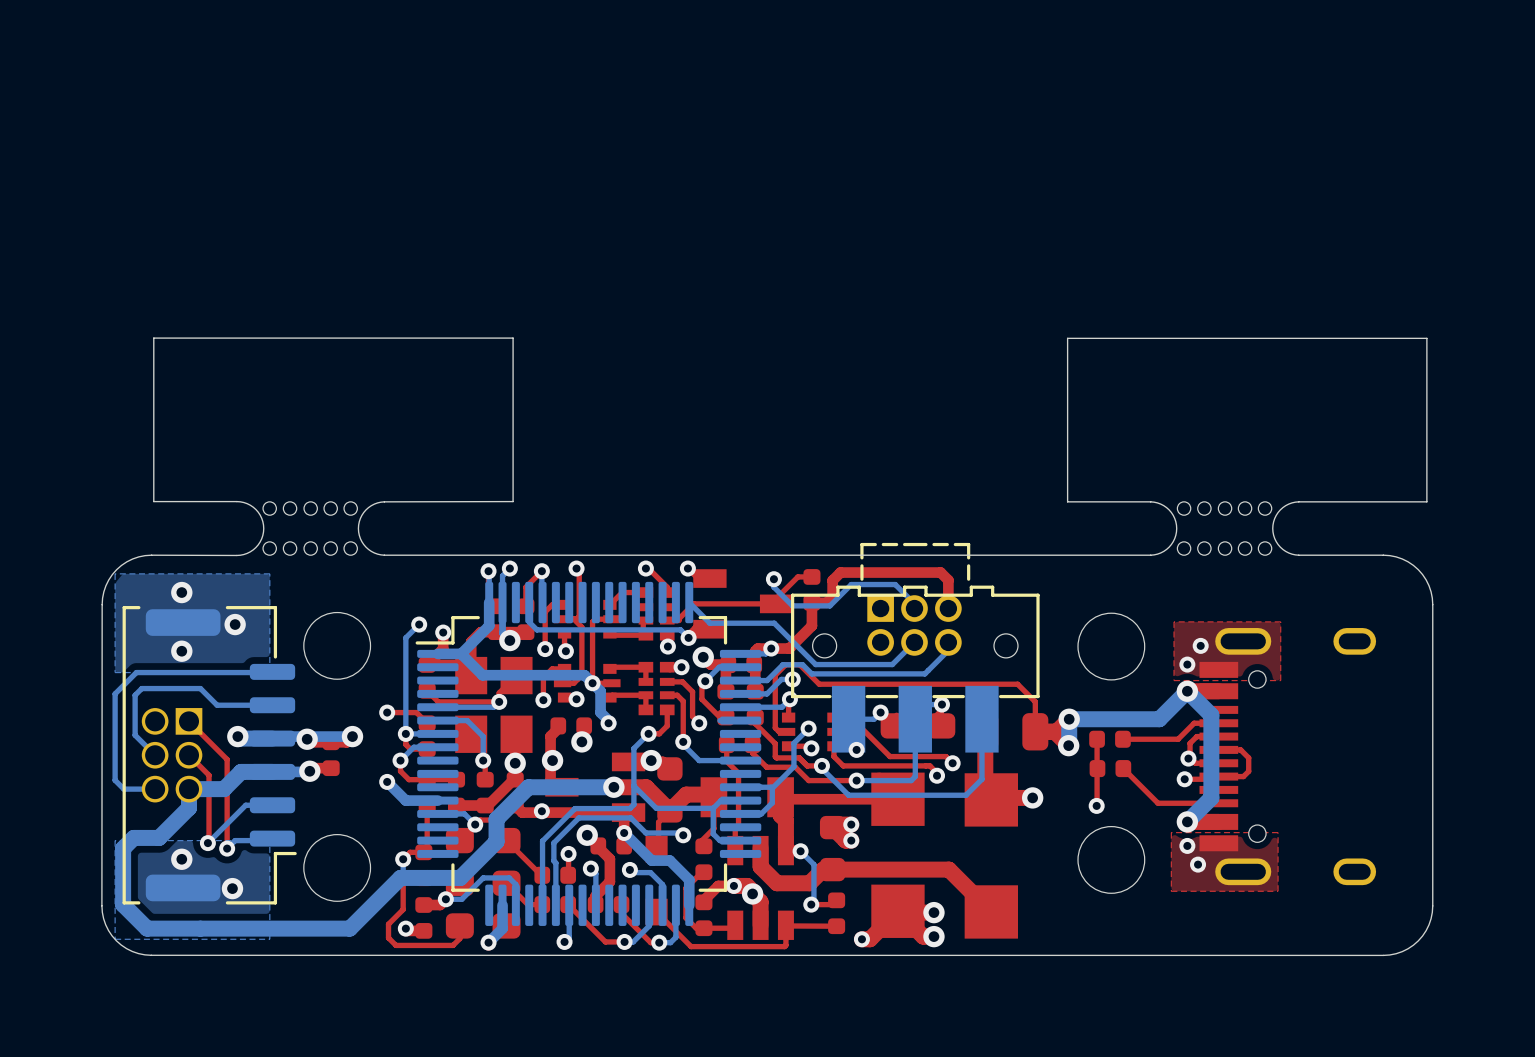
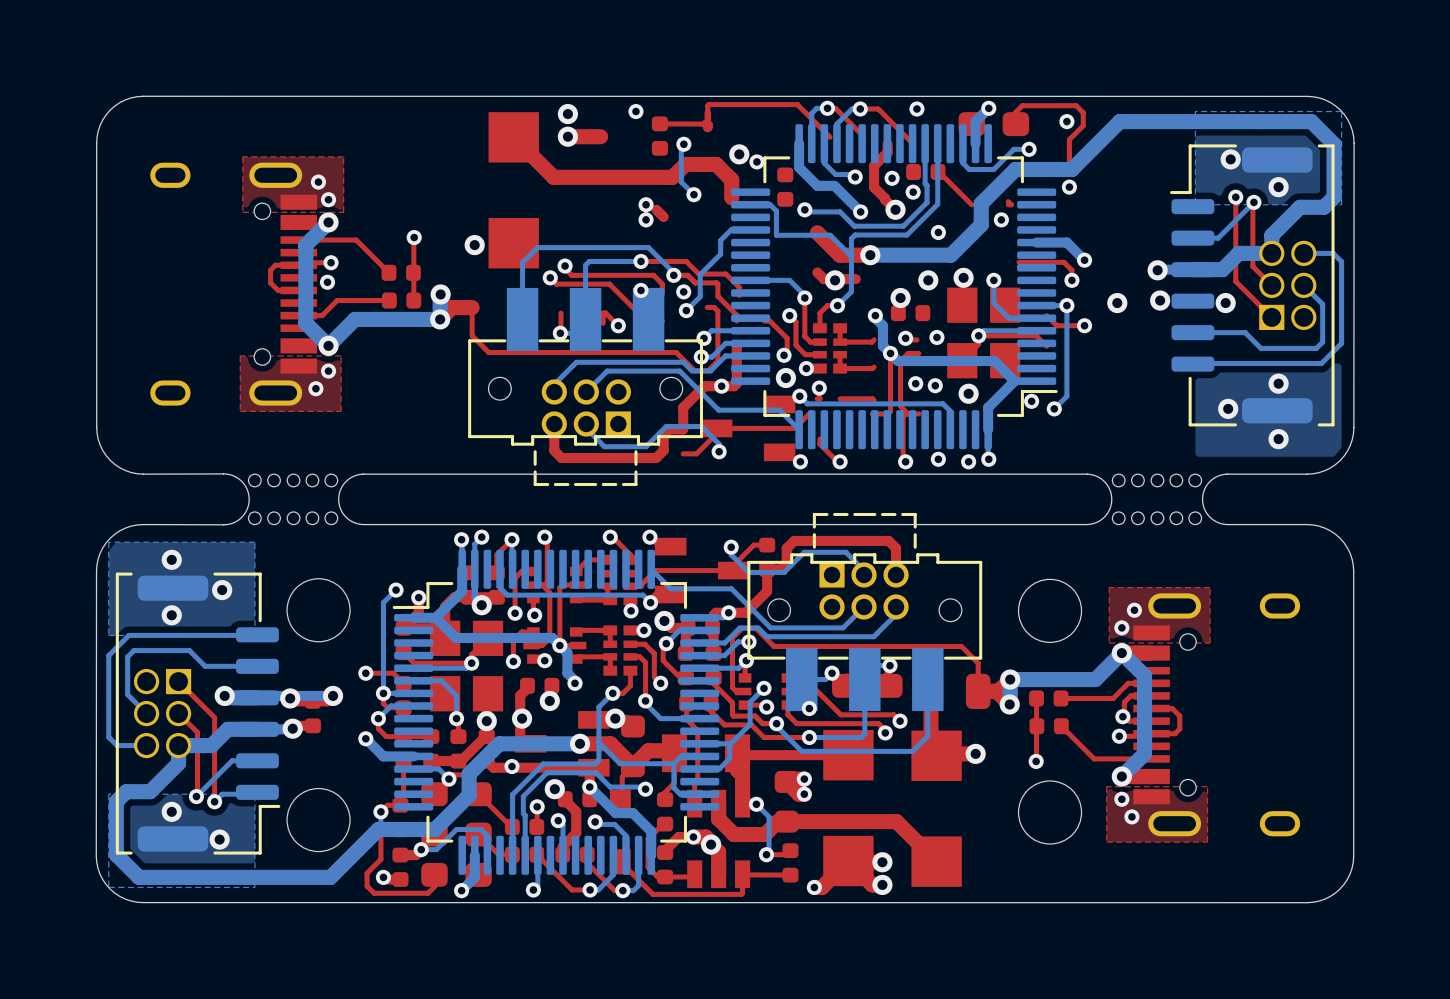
bottom track: none -> (827, 108) (816, 108) (811, 113) (811, 143)
via: none -> (827, 108)
bottom track: none -> (988, 108) (975, 121) (975, 143)
via: none -> (988, 108)
top track: none -> (860, 109) (878, 109) (913, 144) (913, 141)
bottom track: none -> (860, 109) (852, 109) (836, 124) (836, 143)
via: none -> (860, 109)
via: none -> (916, 109)
via: none -> (635, 111)
top track: none -> (830, 111) (827, 108) (835, 108) (863, 135) (863, 144)
bottom zone outline: none -> (1341, 111) (1195, 111) (1195, 204) (1341, 204) (1341, 111)
top track: none -> (707, 112) (707, 127) (706, 124) (659, 123)
via: none -> (567, 114)
via: none -> (1066, 121)
part: none -> (993, 124)
top track: none -> (1019, 124) (1015, 124) (1015, 112) (1022, 105) (1076, 105) (1083, 112) (1083, 125) (1069, 139) (1069, 164) (1064, 169) (1049, 169)
top track: none -> (707, 124) (709, 104) (797, 104) (830, 137)
via: none -> (567, 136)
top track: none -> (600, 136) (567, 136)
part: none -> (659, 136)
top track: none -> (513, 137) (553, 177) (672, 177) (685, 164) (716, 164) (731, 179) (731, 197)
bottom track: none -> (683, 144) (681, 146) (681, 182) (693, 194)
via: none -> (683, 144)
bottom track: none -> (799, 143) (799, 167) (817, 185) (834, 185) (860, 211)
bottom track: none -> (824, 143) (824, 163) (835, 174) (852, 174) (855, 177)
top track: none -> (887, 144) (887, 152) (874, 165) (874, 187) (897, 212)
bottom track: none -> (925, 143) (927, 202) (903, 226) (854, 226) (840, 211) (806, 211) (804, 209)
bottom track: none -> (937, 143) (937, 204) (907, 235) (855, 235) (851, 238) (851, 291) (837, 305)
bottom track: none -> (962, 143) (962, 163) (969, 169) (993, 169) (1013, 149) (1029, 149)
via: none -> (1029, 149)
via: none -> (739, 154)
top zone outline: none -> (343, 156) (242, 156) (242, 212) (343, 212) (343, 156)
via: none -> (1230, 159)
via: none -> (756, 161)
part: none -> (925, 172)
top track: none -> (938, 172) (971, 204)
via: none -> (855, 177)
via: none -> (892, 178)
via: none -> (318, 182)
part: none -> (785, 187)
via: none -> (1069, 187)
via: none -> (1278, 187)
part: none -> (513, 190)
via: none -> (913, 192)
via: none -> (693, 194)
top track: none -> (1235, 197) (1235, 281) (1271, 317)
via: none -> (1235, 197)
via: none -> (328, 199)
top track: none -> (1008, 201) (1011, 204) (1008, 204)
top track: none -> (1253, 202) (1252, 266) (1271, 285)
bottom track: none -> (1253, 202) (1218, 238) (1192, 238)
via: none -> (1253, 202)
via: none -> (646, 204)
bottom track: none -> (751, 206) (750, 204) (770, 204) (776, 211) (776, 235) (830, 235) (851, 256)
top track: none -> (656, 209) (663, 217)
via: none -> (804, 209)
via: none -> (895, 209)
via: none -> (860, 211)
via: none -> (646, 219)
via: none -> (1001, 219)
bottom track: none -> (328, 222) (305, 245) (305, 323) (328, 345) (354, 319) (440, 319) (440, 294)
via: none -> (328, 222)
bottom track: none -> (750, 229) (731, 229) (720, 240) (720, 254) (700, 274) (700, 296) (686, 310)
top track: none -> (817, 232) (839, 255) (870, 255)
via: none -> (938, 232)
top track: none -> (414, 237) (413, 300)
via: none -> (414, 237)
top track: none -> (298, 240) (356, 240) (389, 272)
bottom track: none -> (1036, 242) (1066, 242) (1084, 260)
via: none -> (474, 245)
bottom track: none -> (1303, 253) (1333, 253) (1341, 261) (1341, 343) (1321, 363) (1192, 364)
bottom track: none -> (870, 255) (950, 255) (981, 224) (981, 203) (1015, 169) (1071, 169) (1119, 121) (1311, 121) (1334, 144) (1334, 197) (1323, 207) (1300, 207) (1271, 235) (1271, 253) (1238, 253) (1222, 269) (1157, 270)
via: none -> (870, 255)
via: none -> (1084, 260)
top track: none -> (641, 261) (686, 261) (698, 274) (725, 274) (739, 287) (739, 295)
bottom track: none -> (641, 261) (589, 261) (585, 265) (585, 319) (571, 333) (560, 333)
via: none -> (641, 261)
top track: none -> (1019, 262) (1064, 262) (1071, 270) (1071, 280)
top track: none -> (331, 262) (275, 265) (270, 270) (270, 282) (278, 290) (298, 290)
via: none -> (331, 262)
top track: none -> (565, 266) (564, 267) (571, 275) (653, 275) (662, 284) (662, 293)
via: none -> (565, 266)
via: none -> (1157, 270)
part: none -> (401, 272)
top track: none -> (817, 272) (824, 279) (855, 279)
top track: none -> (673, 275) (687, 275) (695, 282) (716, 282) (717, 296) (736, 315) (736, 321)
bottom track: none -> (673, 275) (673, 272) (648, 247) (537, 247) (522, 262) (522, 319)
via: none -> (673, 275)
top track: none -> (550, 277) (556, 284) (609, 284) (646, 321) (662, 321)
via: none -> (550, 277)
via: none -> (963, 277)
bottom track: none -> (750, 280) (789, 280) (804, 295)
via: none -> (835, 280)
via: none -> (928, 280)
bottom track: none -> (993, 280) (993, 303) (1008, 318) (1036, 318)
via: none -> (993, 280)
via: none -> (1071, 280)
via: none -> (327, 282)
part: none -> (233, 284)
part: none -> (1252, 285)
part: none -> (1287, 285)
bottom track: none -> (1303, 285) (1322, 304) (1322, 342) (1316, 348) (1260, 348) (1245, 332) (1192, 332)
part: none -> (894, 286)
via: none -> (641, 290)
via: none -> (683, 291)
via: none -> (440, 294)
top track: none -> (804, 298) (804, 336) (810, 342) (819, 342)
via: none -> (804, 298)
via: none -> (900, 298)
top track: none -> (389, 300) (337, 300) (322, 315) (298, 315)
part: none -> (401, 300)
via: none -> (1160, 300)
via: none -> (1117, 303)
via: none -> (1225, 303)
top track: none -> (837, 305) (827, 305) (819, 313) (819, 328)
via: none -> (837, 305)
bottom track: none -> (1036, 305) (1066, 305) (1066, 396) (1054, 408)
via: none -> (1066, 305)
top track: none -> (707, 307) (714, 307) (717, 311) (717, 361) (707, 370) (694, 370) (676, 352) (488, 352) (472, 335) (472, 307) (452, 307) (440, 319)
via: none -> (686, 310)
top track: none -> (561, 313) (560, 333)
part: none -> (910, 313)
top track: none -> (789, 315) (796, 321) (796, 345) (805, 354) (819, 354)
via: none -> (789, 315)
bottom track: none -> (872, 315) (882, 325) (882, 345) (898, 361) (994, 361) (1014, 381) (988, 407) (988, 459)
via: none -> (875, 315)
top track: none -> (1046, 315) (1056, 325) (1084, 325)
via: none -> (440, 319)
top track: none -> (764, 321) (769, 321) (787, 338) (787, 355)
top track: none -> (603, 323) (603, 313) (605, 313) (618, 325)
via: none -> (618, 325)
via: none -> (1084, 325)
top track: none -> (840, 328) (840, 342) (871, 342) (874, 339)
bottom track: none -> (750, 330) (711, 330) (704, 338)
bottom track: none -> (1036, 330) (983, 330) (978, 335)
via: none -> (560, 333)
part: none -> (983, 332)
via: none -> (978, 335)
via: none -> (936, 337)
via: none -> (704, 338)
via: none -> (905, 338)
top track: none -> (916, 339) (907, 339)
bottom track: none -> (750, 343) (725, 343) (712, 357) (701, 357)
via: none -> (328, 345)
top track: none -> (737, 345) (736, 383) (734, 386) (704, 386) (683, 407) (683, 429) (668, 429) (663, 434) (663, 450) (656, 458) (561, 458) (554, 450) (554, 424)
top track: none -> (1046, 346) (1036, 335) (978, 335) (978, 344) (962, 360)
part: none -> (830, 348)
via: none -> (890, 353)
top track: none -> (918, 353) (908, 353) (900, 363) (900, 406) (908, 413)
top track: none -> (840, 354) (840, 368) (872, 368) (874, 366)
top track: none -> (889, 354) (890, 353) (890, 411) (887, 413) (872, 413)
top zone outline: none -> (341, 355) (240, 355) (240, 411) (341, 411) (341, 355)
bottom track: none -> (750, 355) (725, 355) (710, 370) (692, 370) (683, 362) (576, 362) (554, 384)
via: none -> (784, 355)
via: none -> (701, 357)
via: none -> (806, 368)
via: none -> (328, 371)
via: none -> (785, 378)
via: none -> (915, 383)
via: none -> (1278, 383)
via: none -> (721, 386)
via: none -> (935, 385)
part: none -> (585, 386)
top track: none -> (819, 388) (819, 398) (817, 398)
via: none -> (819, 388)
via: none -> (315, 388)
bottom track: none -> (586, 392) (607, 371) (679, 371) (718, 410) (779, 410) (799, 429)
via: none -> (968, 393)
bottom track: none -> (799, 396) (807, 403) (943, 403) (950, 411) (950, 429)
via: none -> (799, 396)
top track: none -> (840, 398) (872, 398) (874, 400)
via: none -> (1031, 401)
part: none -> (586, 408)
via: none -> (1054, 408)
via: none -> (1228, 408)
top track: none -> (810, 412) (794, 428) (716, 428) (716, 433) (696, 453) (683, 453)
top track: none -> (918, 413) (905, 413) (903, 416) (903, 459) (905, 461)
bottom track: none -> (586, 424) (586, 428) (604, 446) (646, 446) (666, 426) (701, 426) (719, 444) (719, 451)
part: none -> (748, 428)
top track: none -> (819, 439) (819, 444) (835, 459) (840, 459)
via: none -> (1278, 439)
via: none -> (719, 451)
via: none -> (938, 459)
via: none -> (988, 459)
via: none -> (800, 461)
via: none -> (840, 461)
via: none -> (905, 461)
via: none -> (968, 461)
board edge: (384, 501) (513, 501) (513, 338) (153, 338) (153, 501) (236, 501) (250, 505) (261, 518) (262, 535) (253, 549) (236, 555) -> (363, 474) (1008, 474)
board edge: (1383, 501) (1426, 501) (1426, 338) (1067, 338) (1067, 501) -> (1307, 474) (1325, 470) (1340, 460) (1350, 445) (1353, 427) (1353, 137) (1347, 119) (1340, 110) (1330, 102) (1319, 97) (1307, 96) (143, 96) (131, 97) (120, 102) (110, 109) (100, 125) (97, 136) (96, 427) (98, 439) (102, 450) (110, 460) (120, 467) (131, 472) (226, 474) (238, 478) (247, 490) (249, 499) (247, 508) (238, 520) (223, 524)

